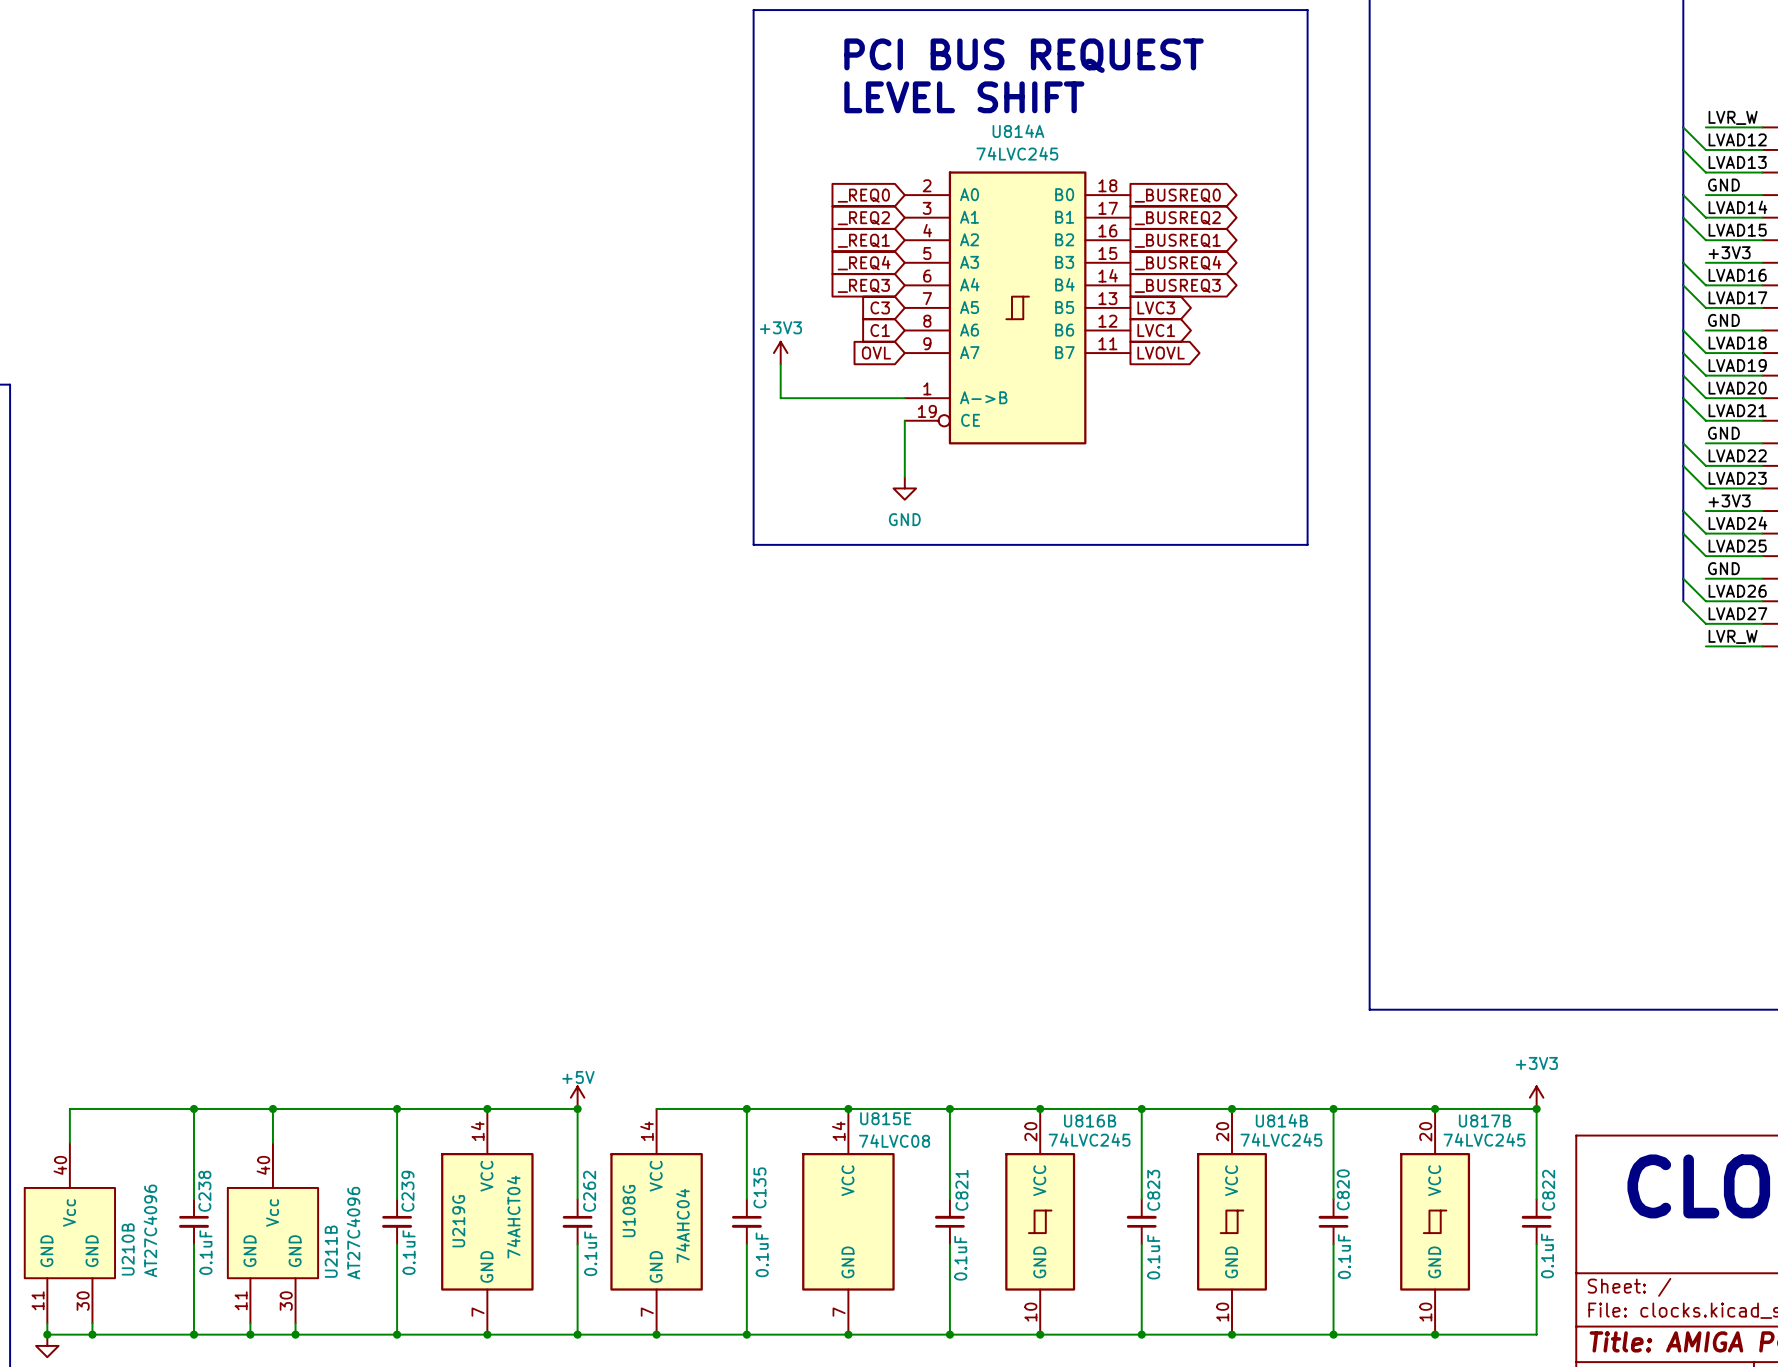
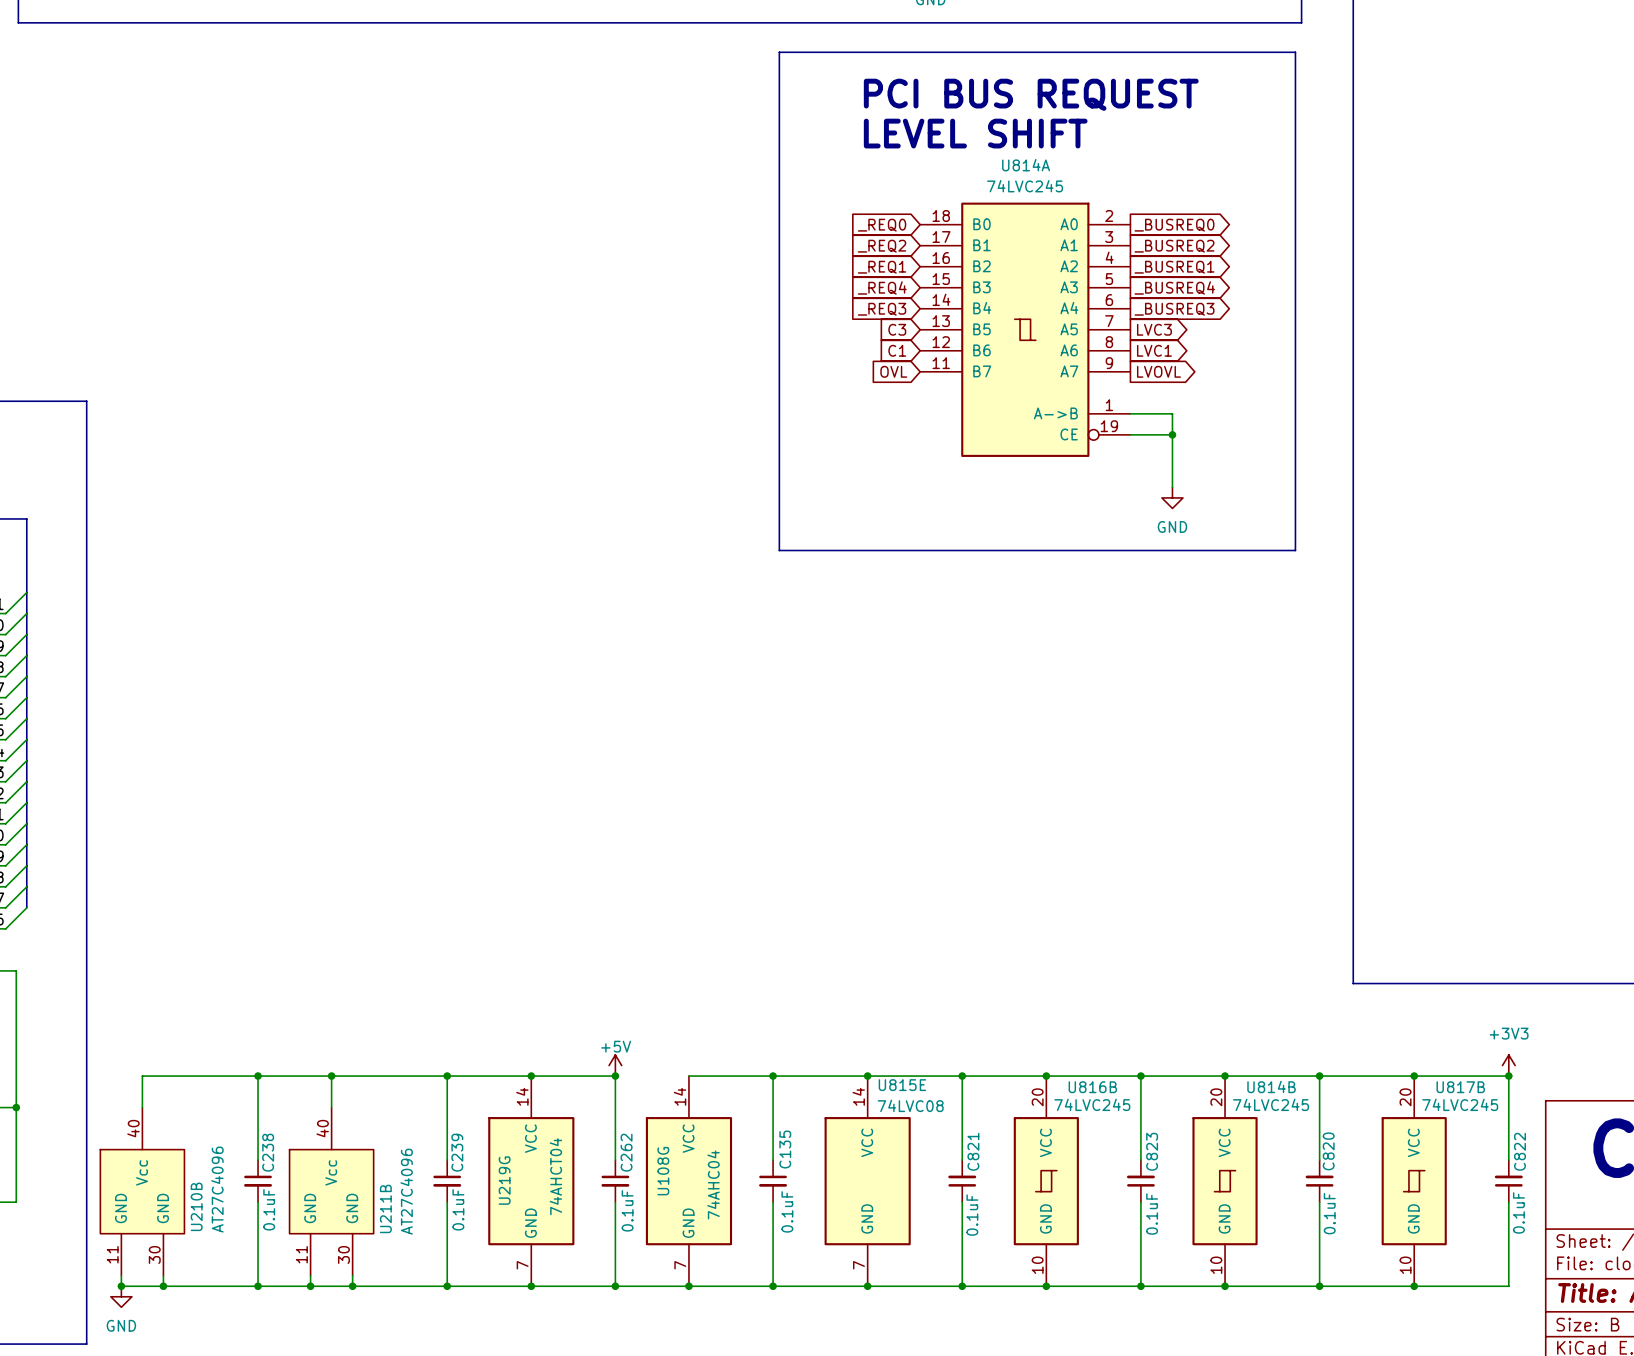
U814A flip: as is (1017, 307) -> left-right (1025, 329)
power symbol: +3V3 (780, 353) -> none
wire: (780, 364) (780, 398) (904, 398) -> none
wire: none -> (1130, 413) (1172, 413) (1172, 487)
wire: (904, 420) (904, 477) -> none
wire: none -> (1130, 434) (1172, 434)
junction: none -> (1172, 434)
power symbol: GND (904, 488) -> none
power symbol: none -> GND (1172, 497)

